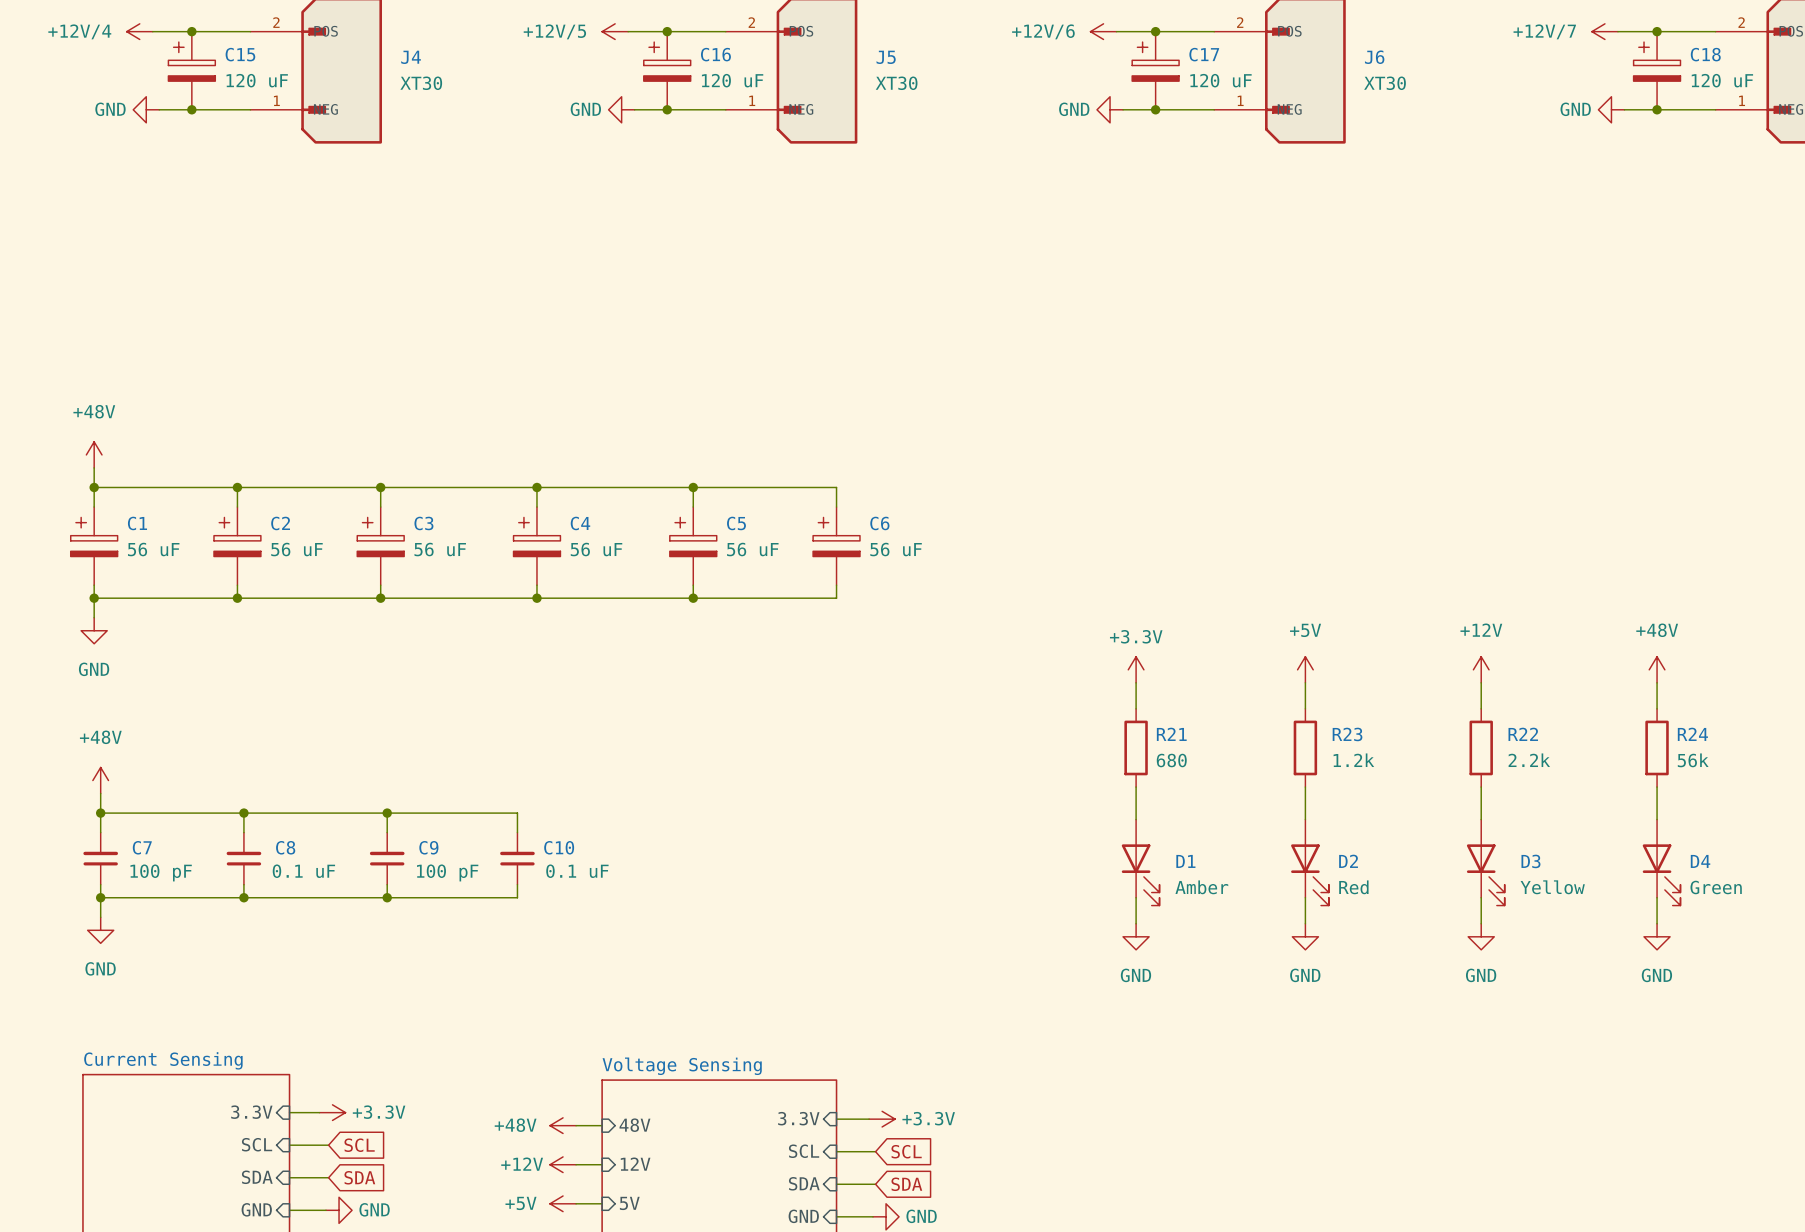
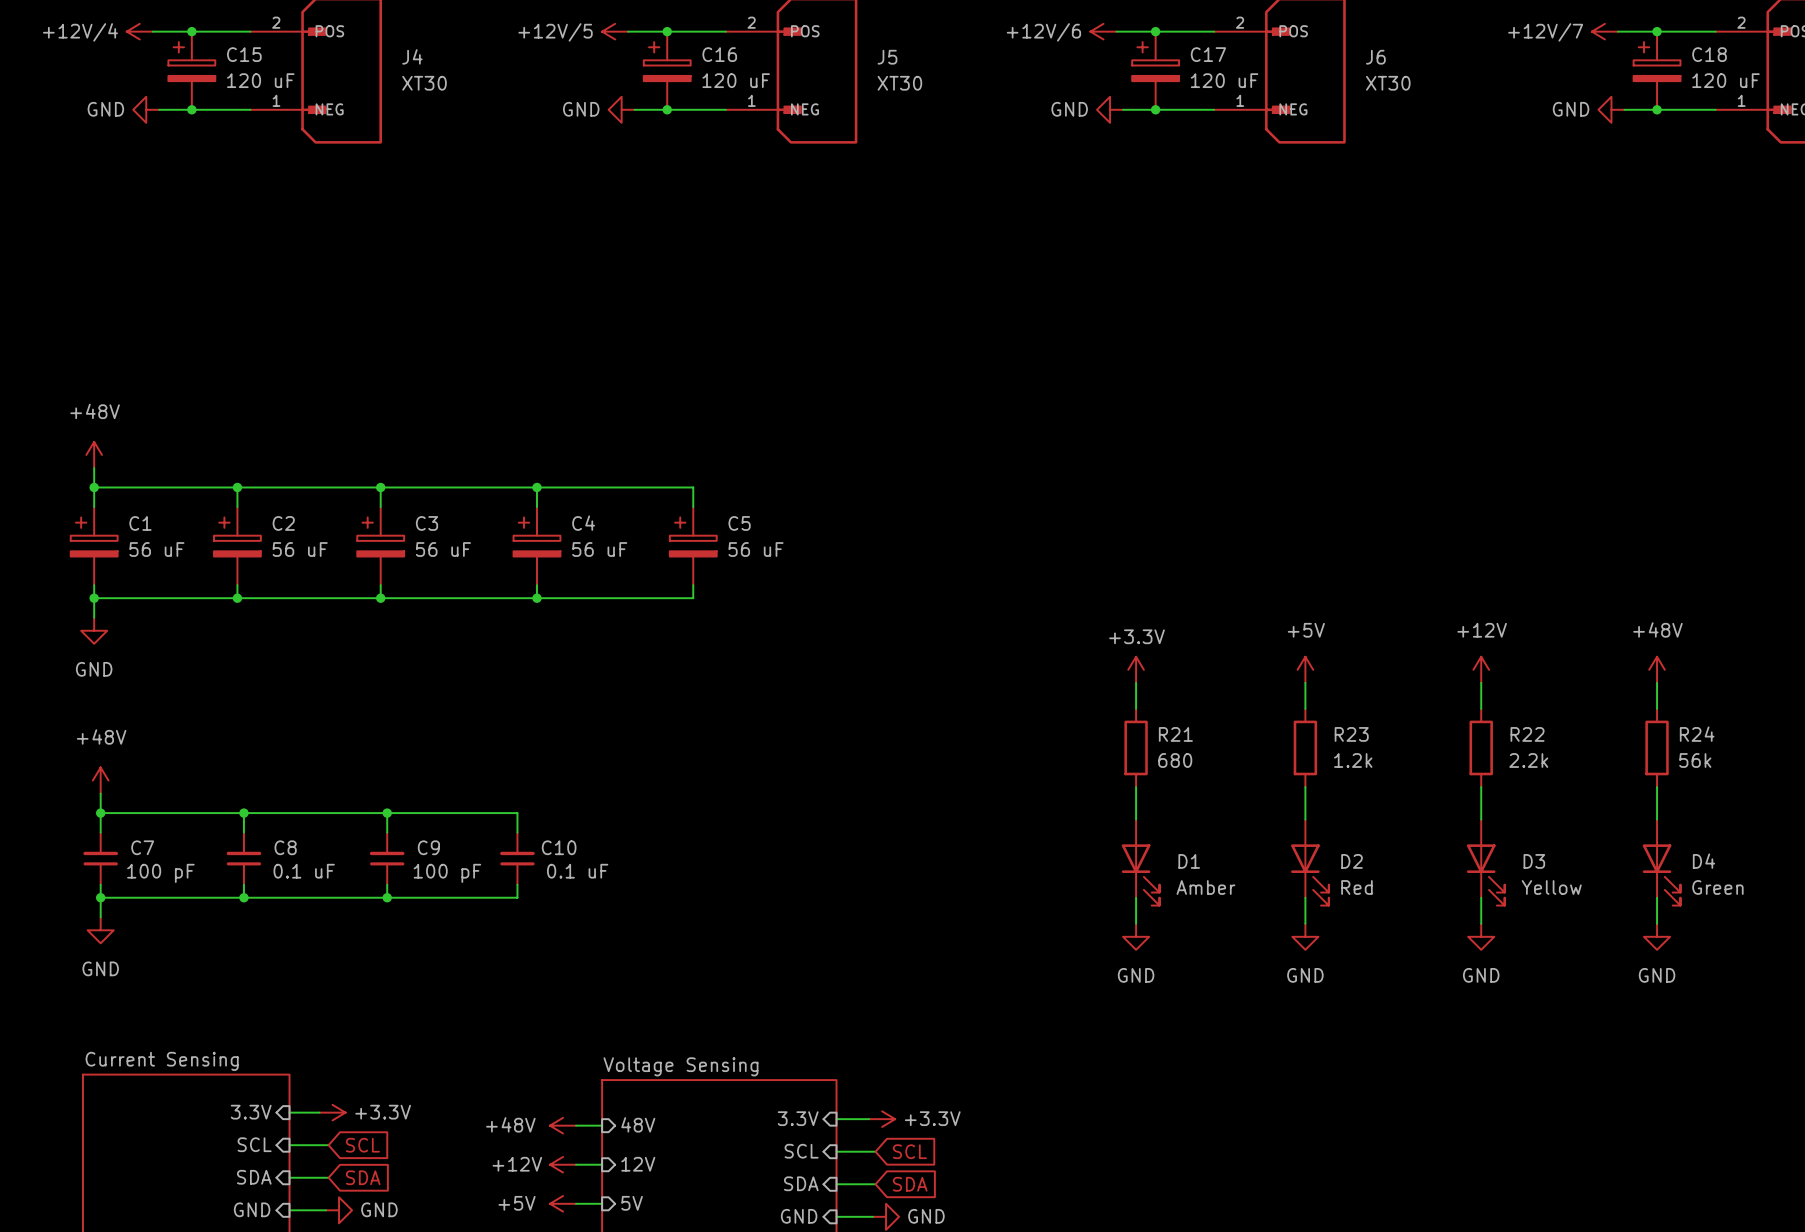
wire: (693, 487) (836, 487) (836, 507) -> none
junction: (693, 487) -> none
C6: 56 uF (836, 546) -> none
wire: (836, 585) (836, 598) (693, 598) -> none
junction: (693, 598) -> none

